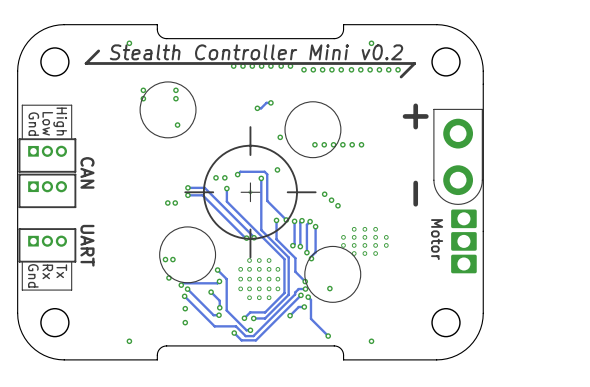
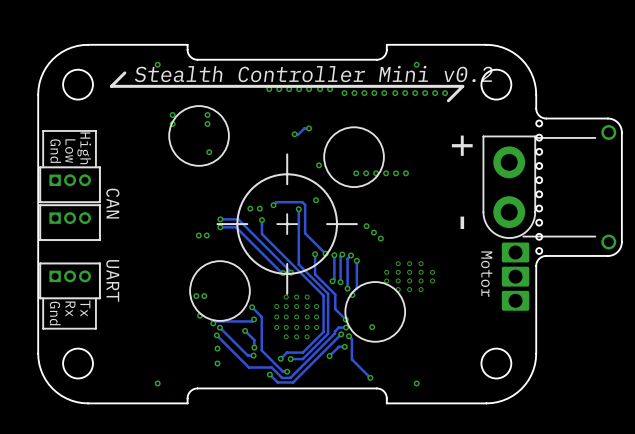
board edge: (483, 84) (483, 231) -> (536, 108) (539, 115) (544, 118) (611, 118) (619, 123) (621, 132) (621, 242) (620, 249) (609, 255) (543, 256) (538, 259) (536, 265)
round board edge: none -> [535, 120, 543, 127]
round board edge: none -> [535, 134, 543, 141]
round board edge: none -> [535, 148, 543, 156]
round board edge: none -> [535, 162, 543, 170]
round board edge: none -> [535, 176, 543, 184]
part: (458, 156) -> none
part: none -> (549, 187)
round board edge: none -> [535, 191, 543, 198]
round board edge: none -> [535, 205, 543, 212]
round board edge: none -> [535, 219, 543, 226]
round board edge: none -> [535, 233, 543, 241]
round board edge: none -> [535, 247, 543, 255]

